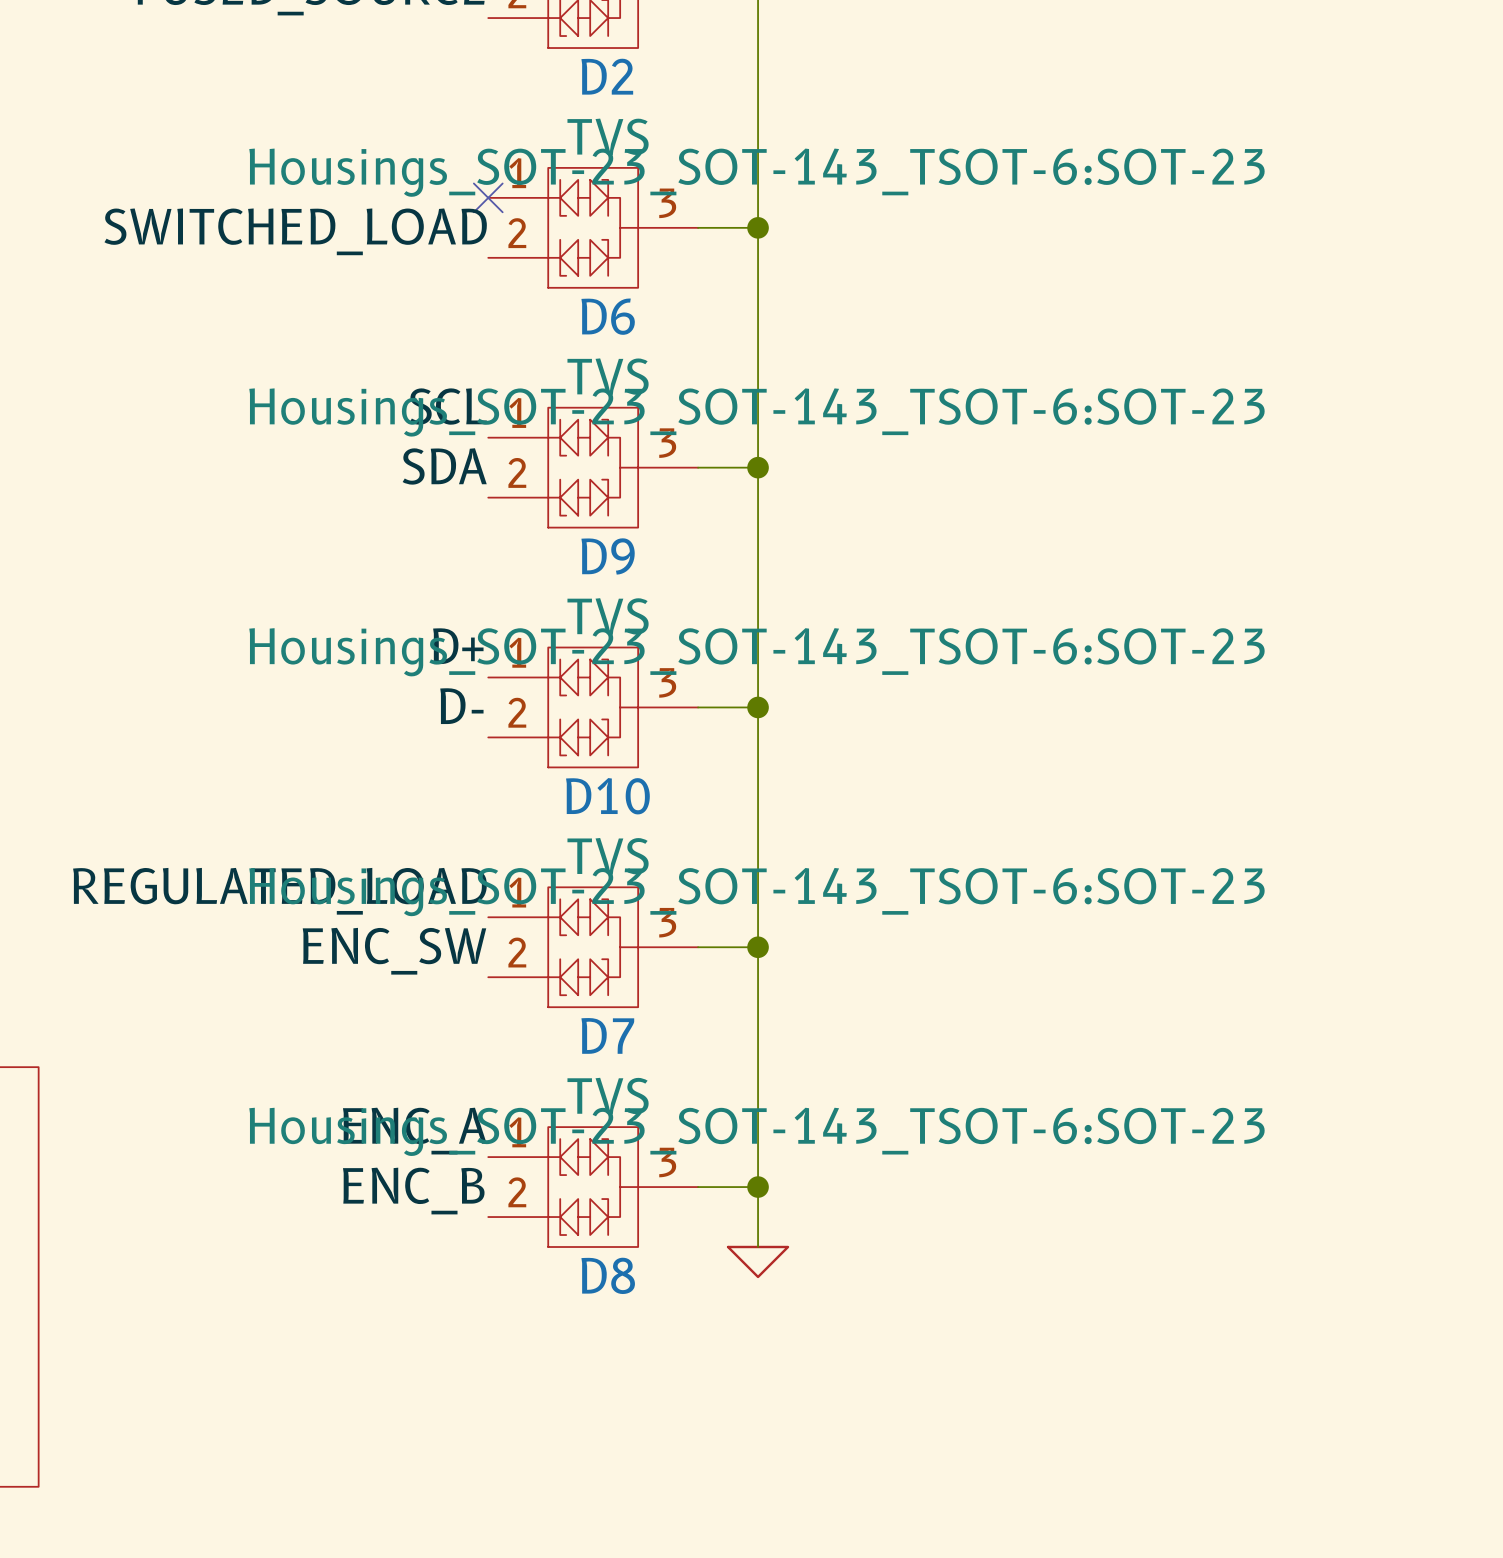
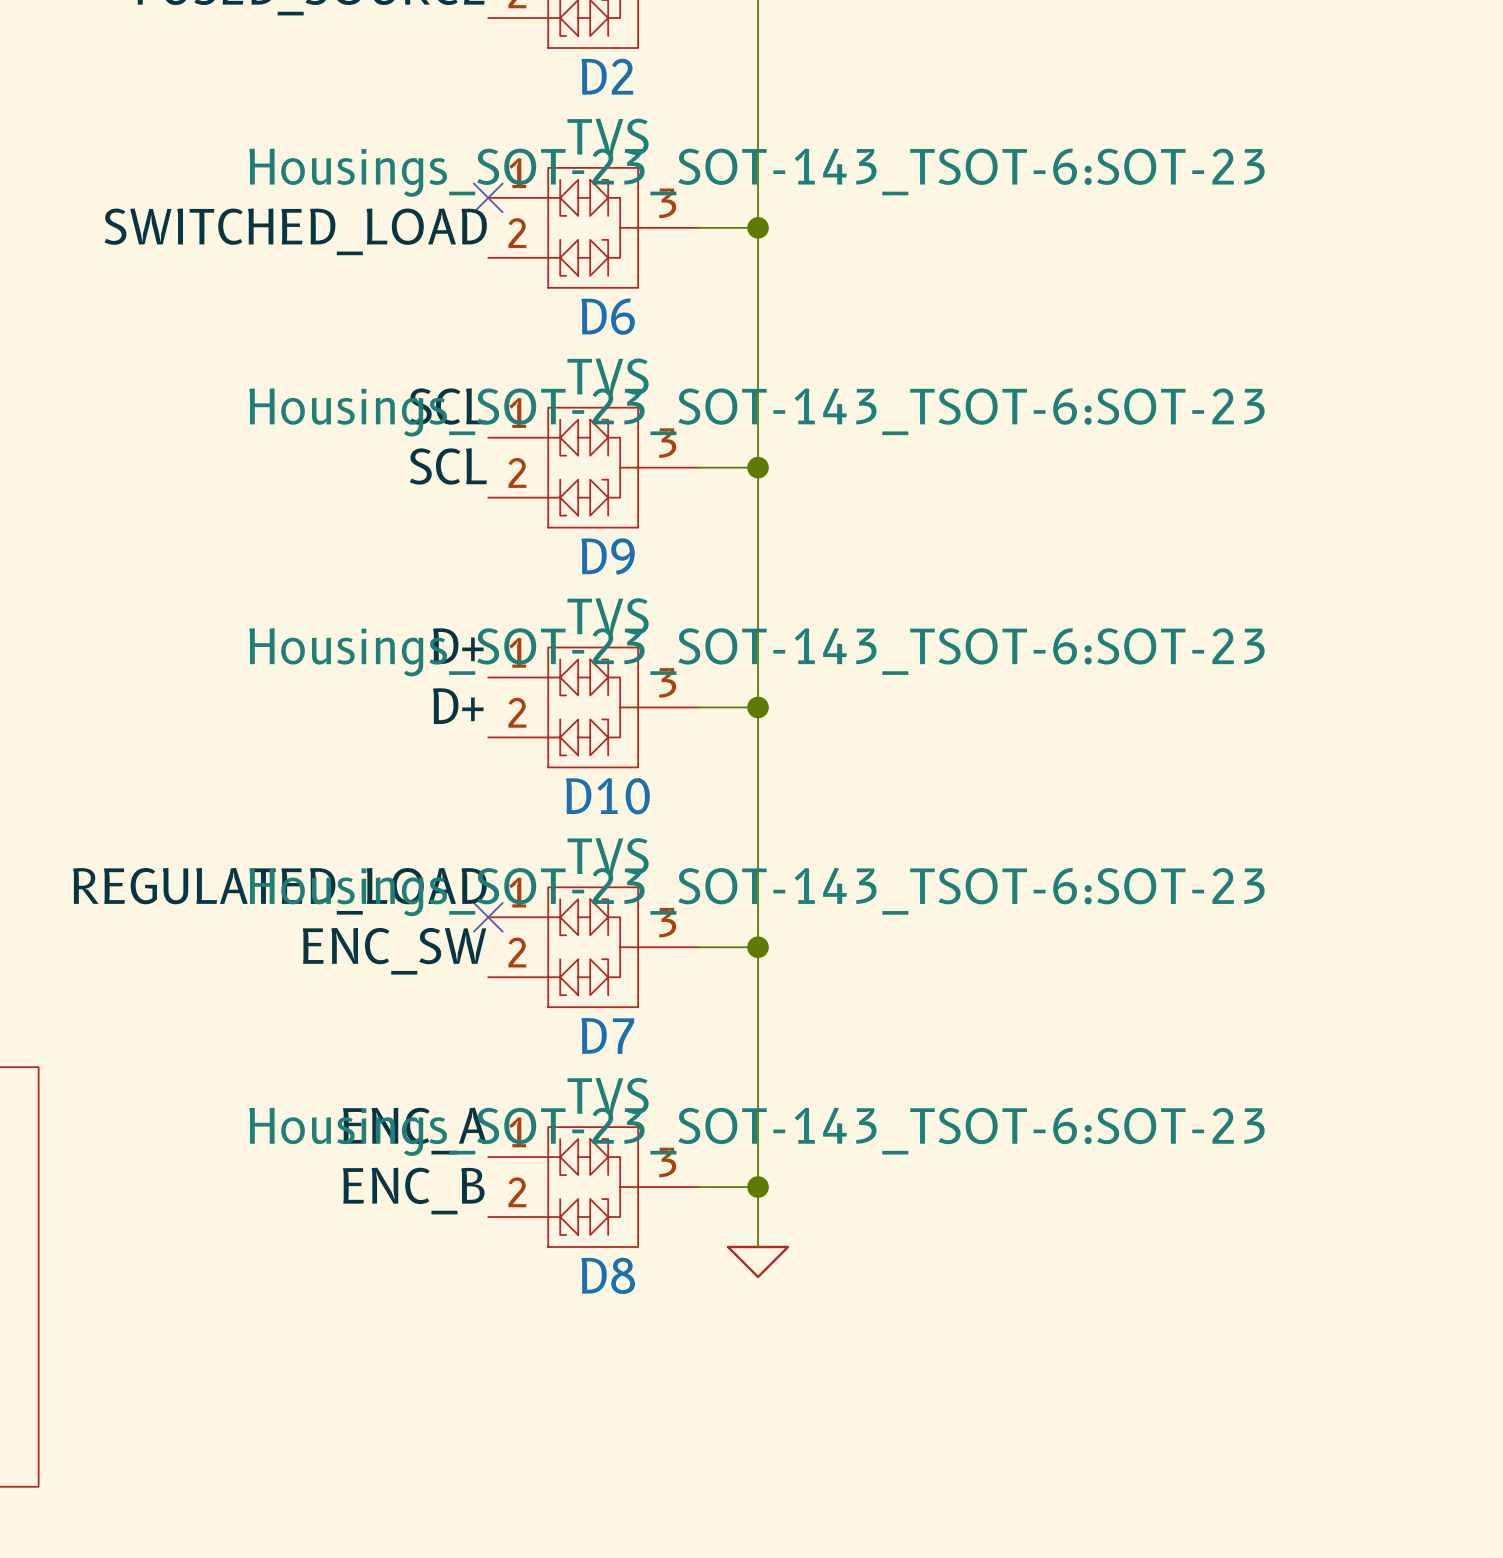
label: SDA (444, 466) -> SCL (448, 466)
label: D- (461, 706) -> D+ (458, 706)
no-connect mark: none -> (488, 917)

